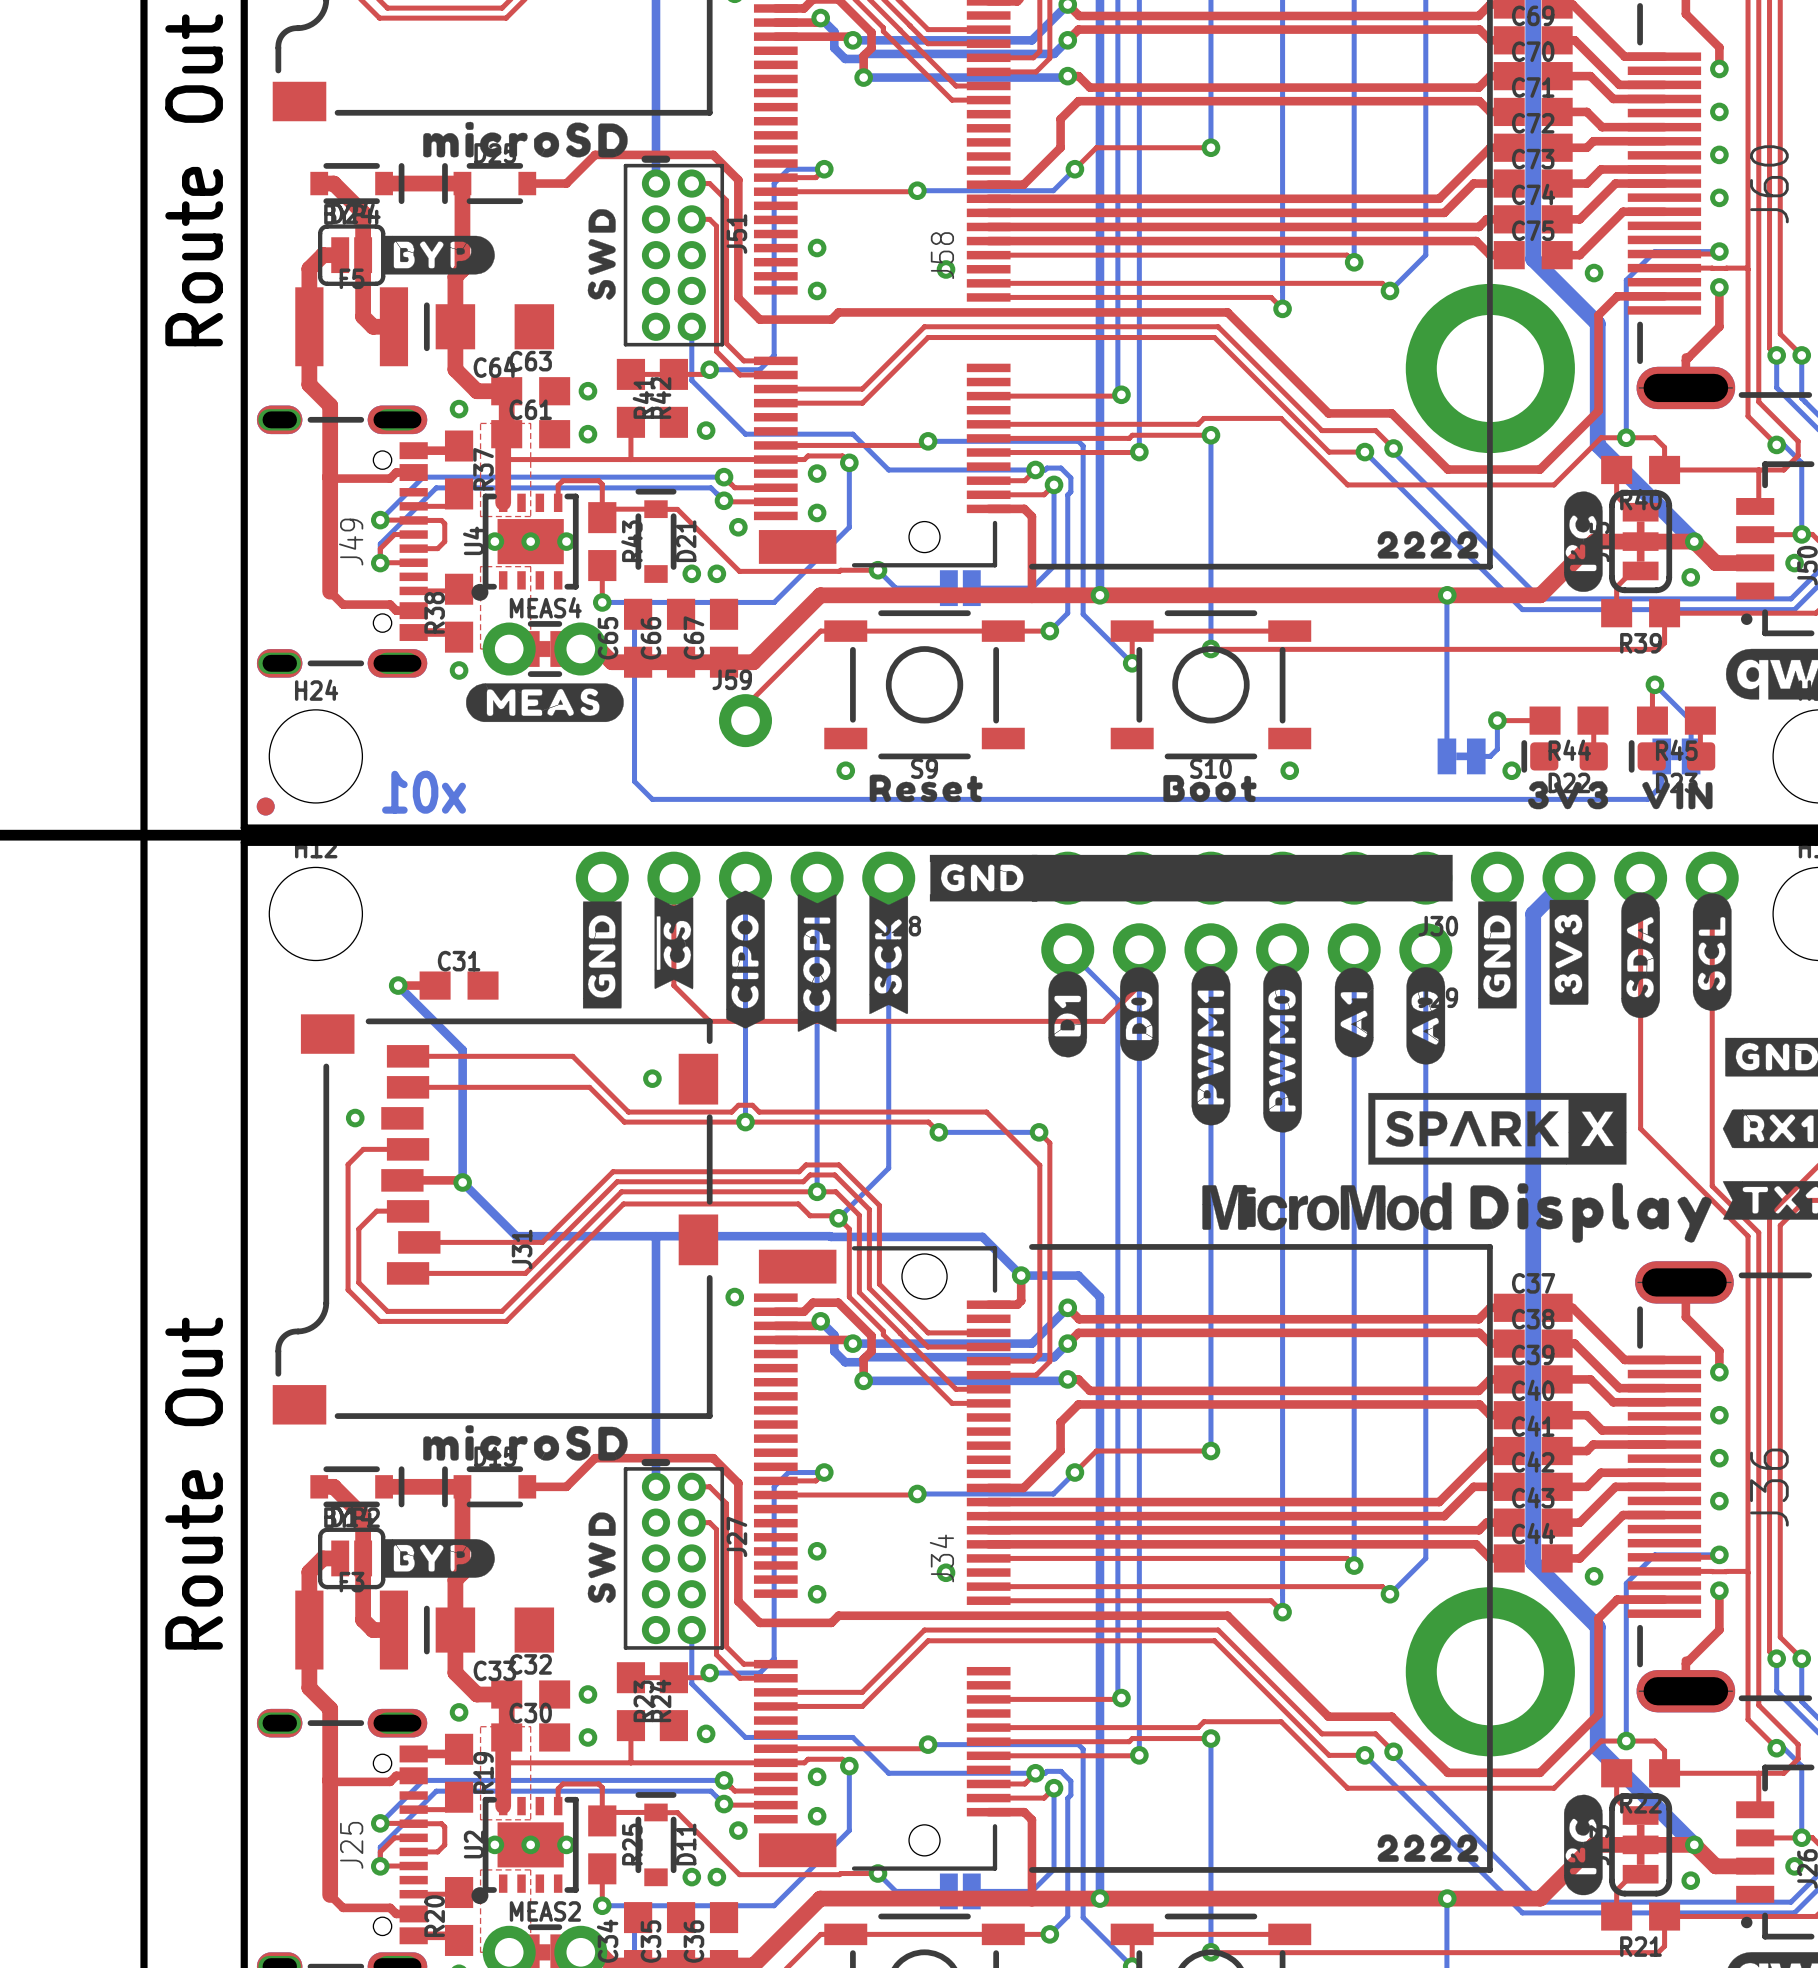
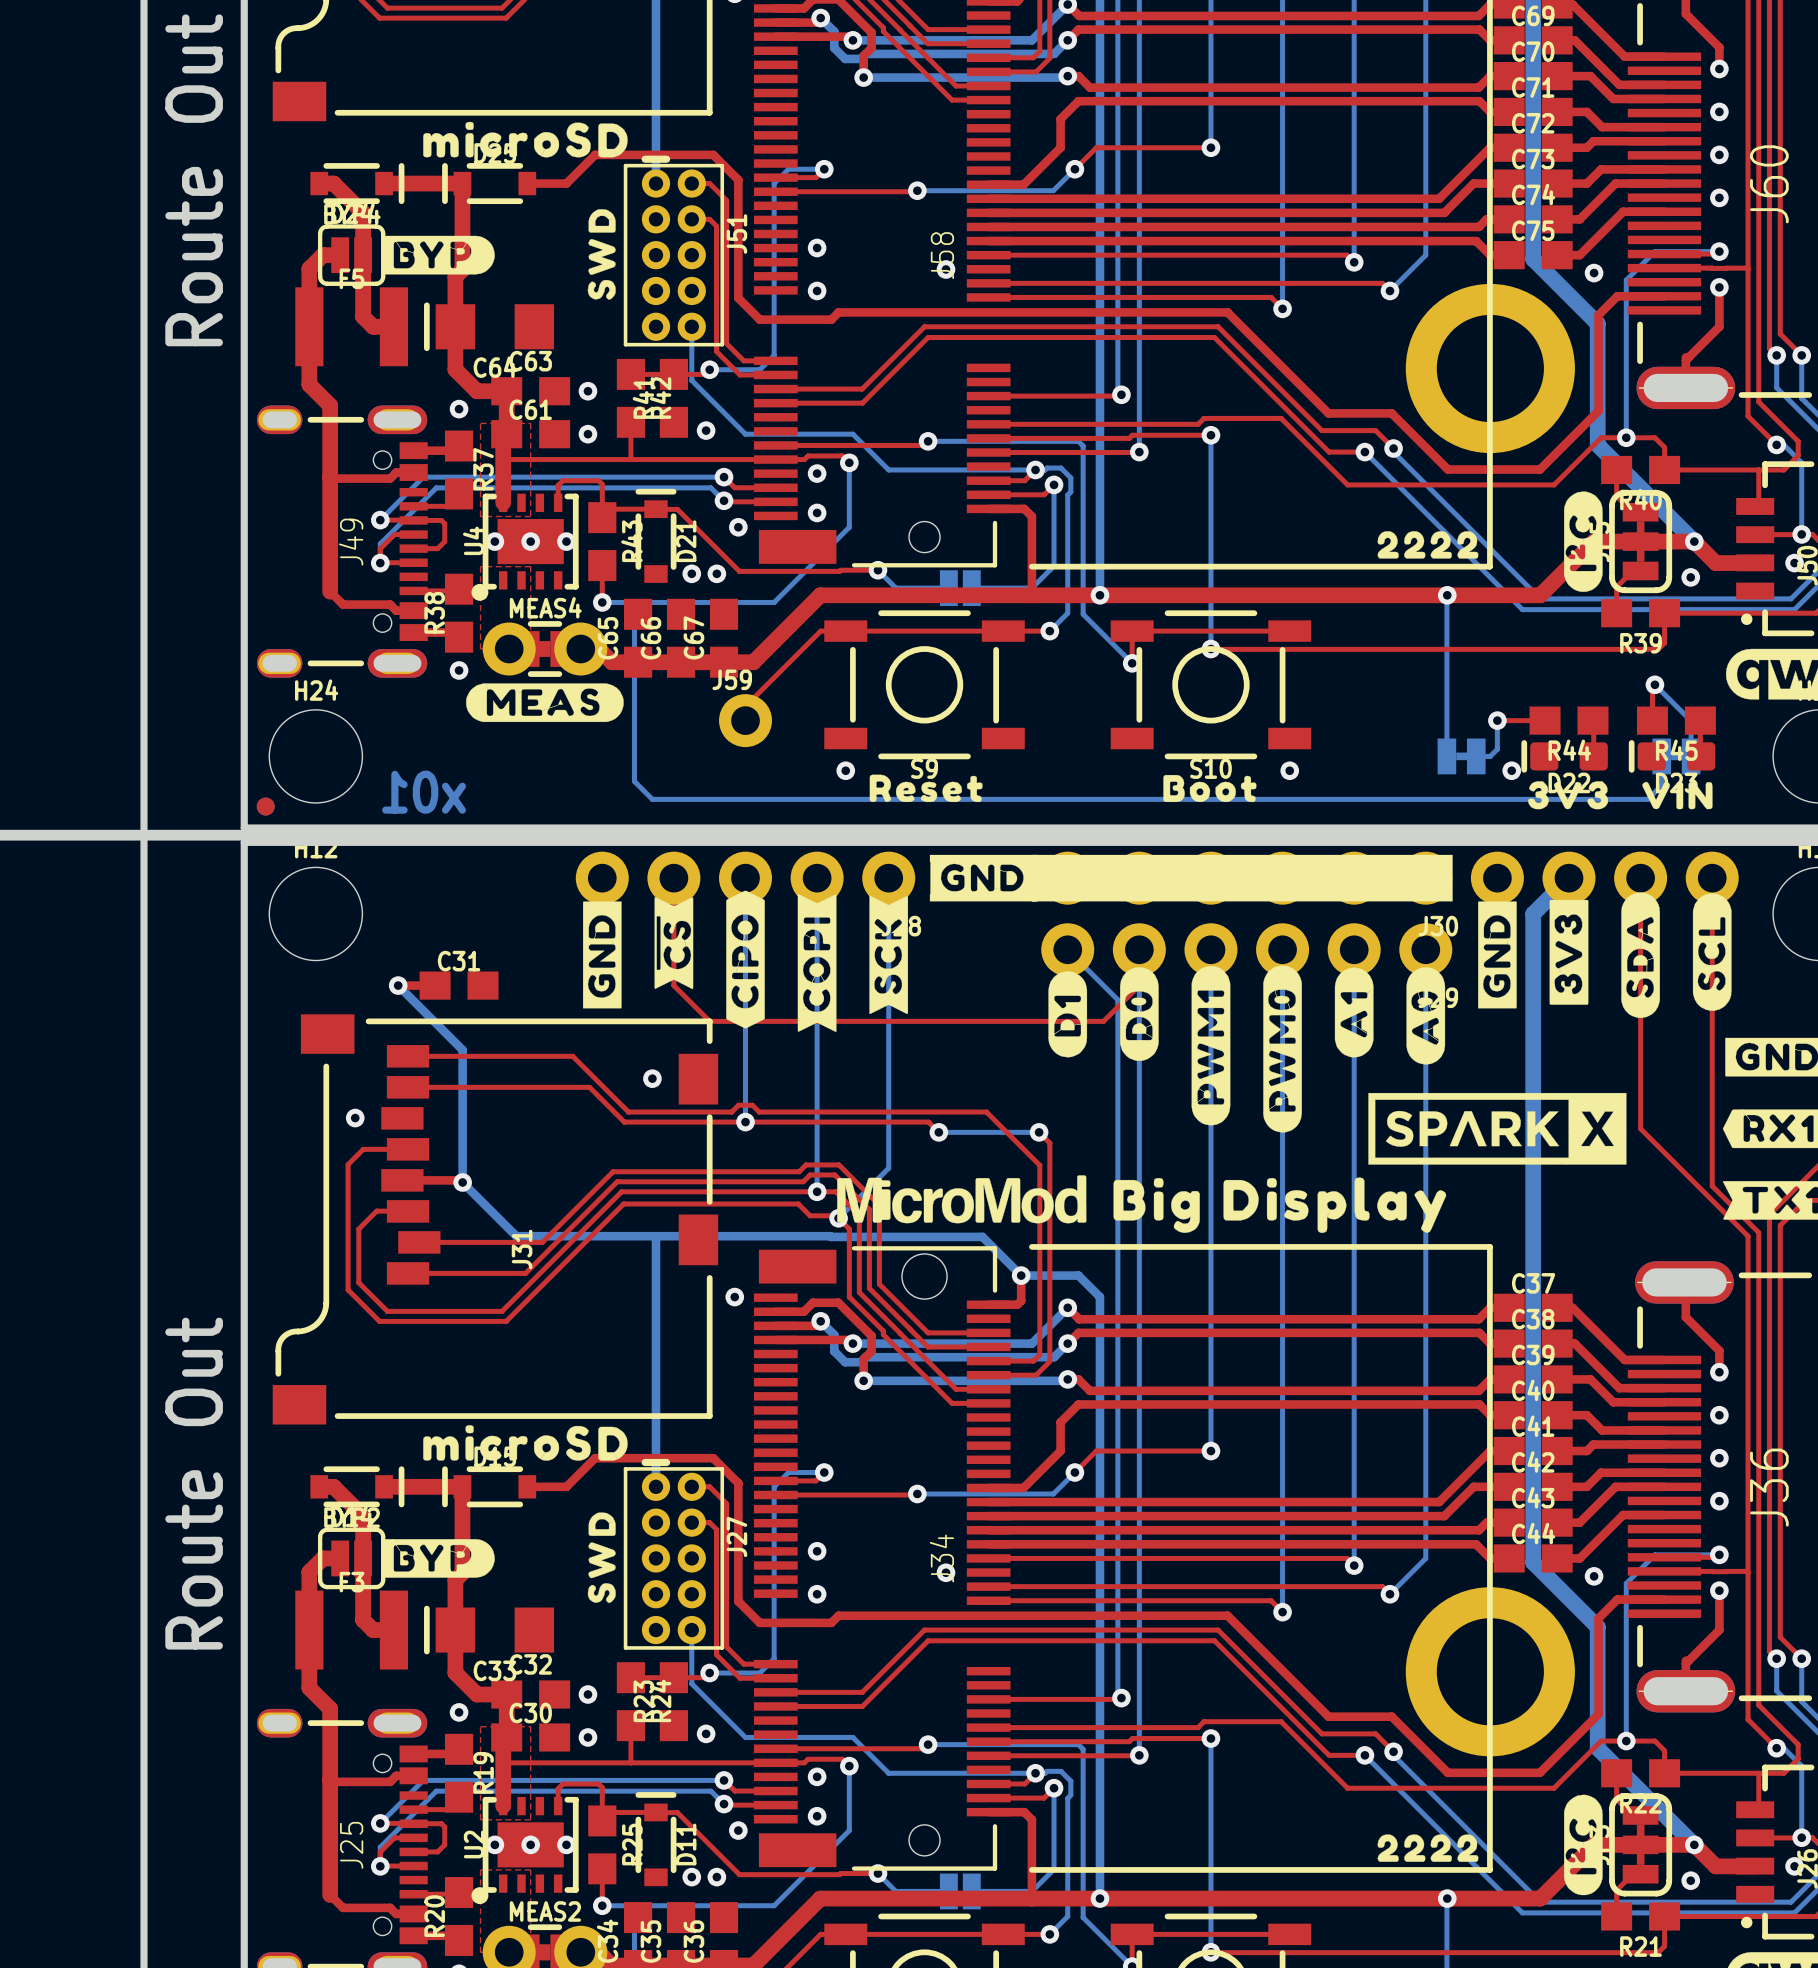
drawing: none -> [1113, 1177, 1447, 1233]
drawing: [1470, 1182, 1712, 1243] -> none
drawing position: (1326, 1206) -> (961, 1199)

